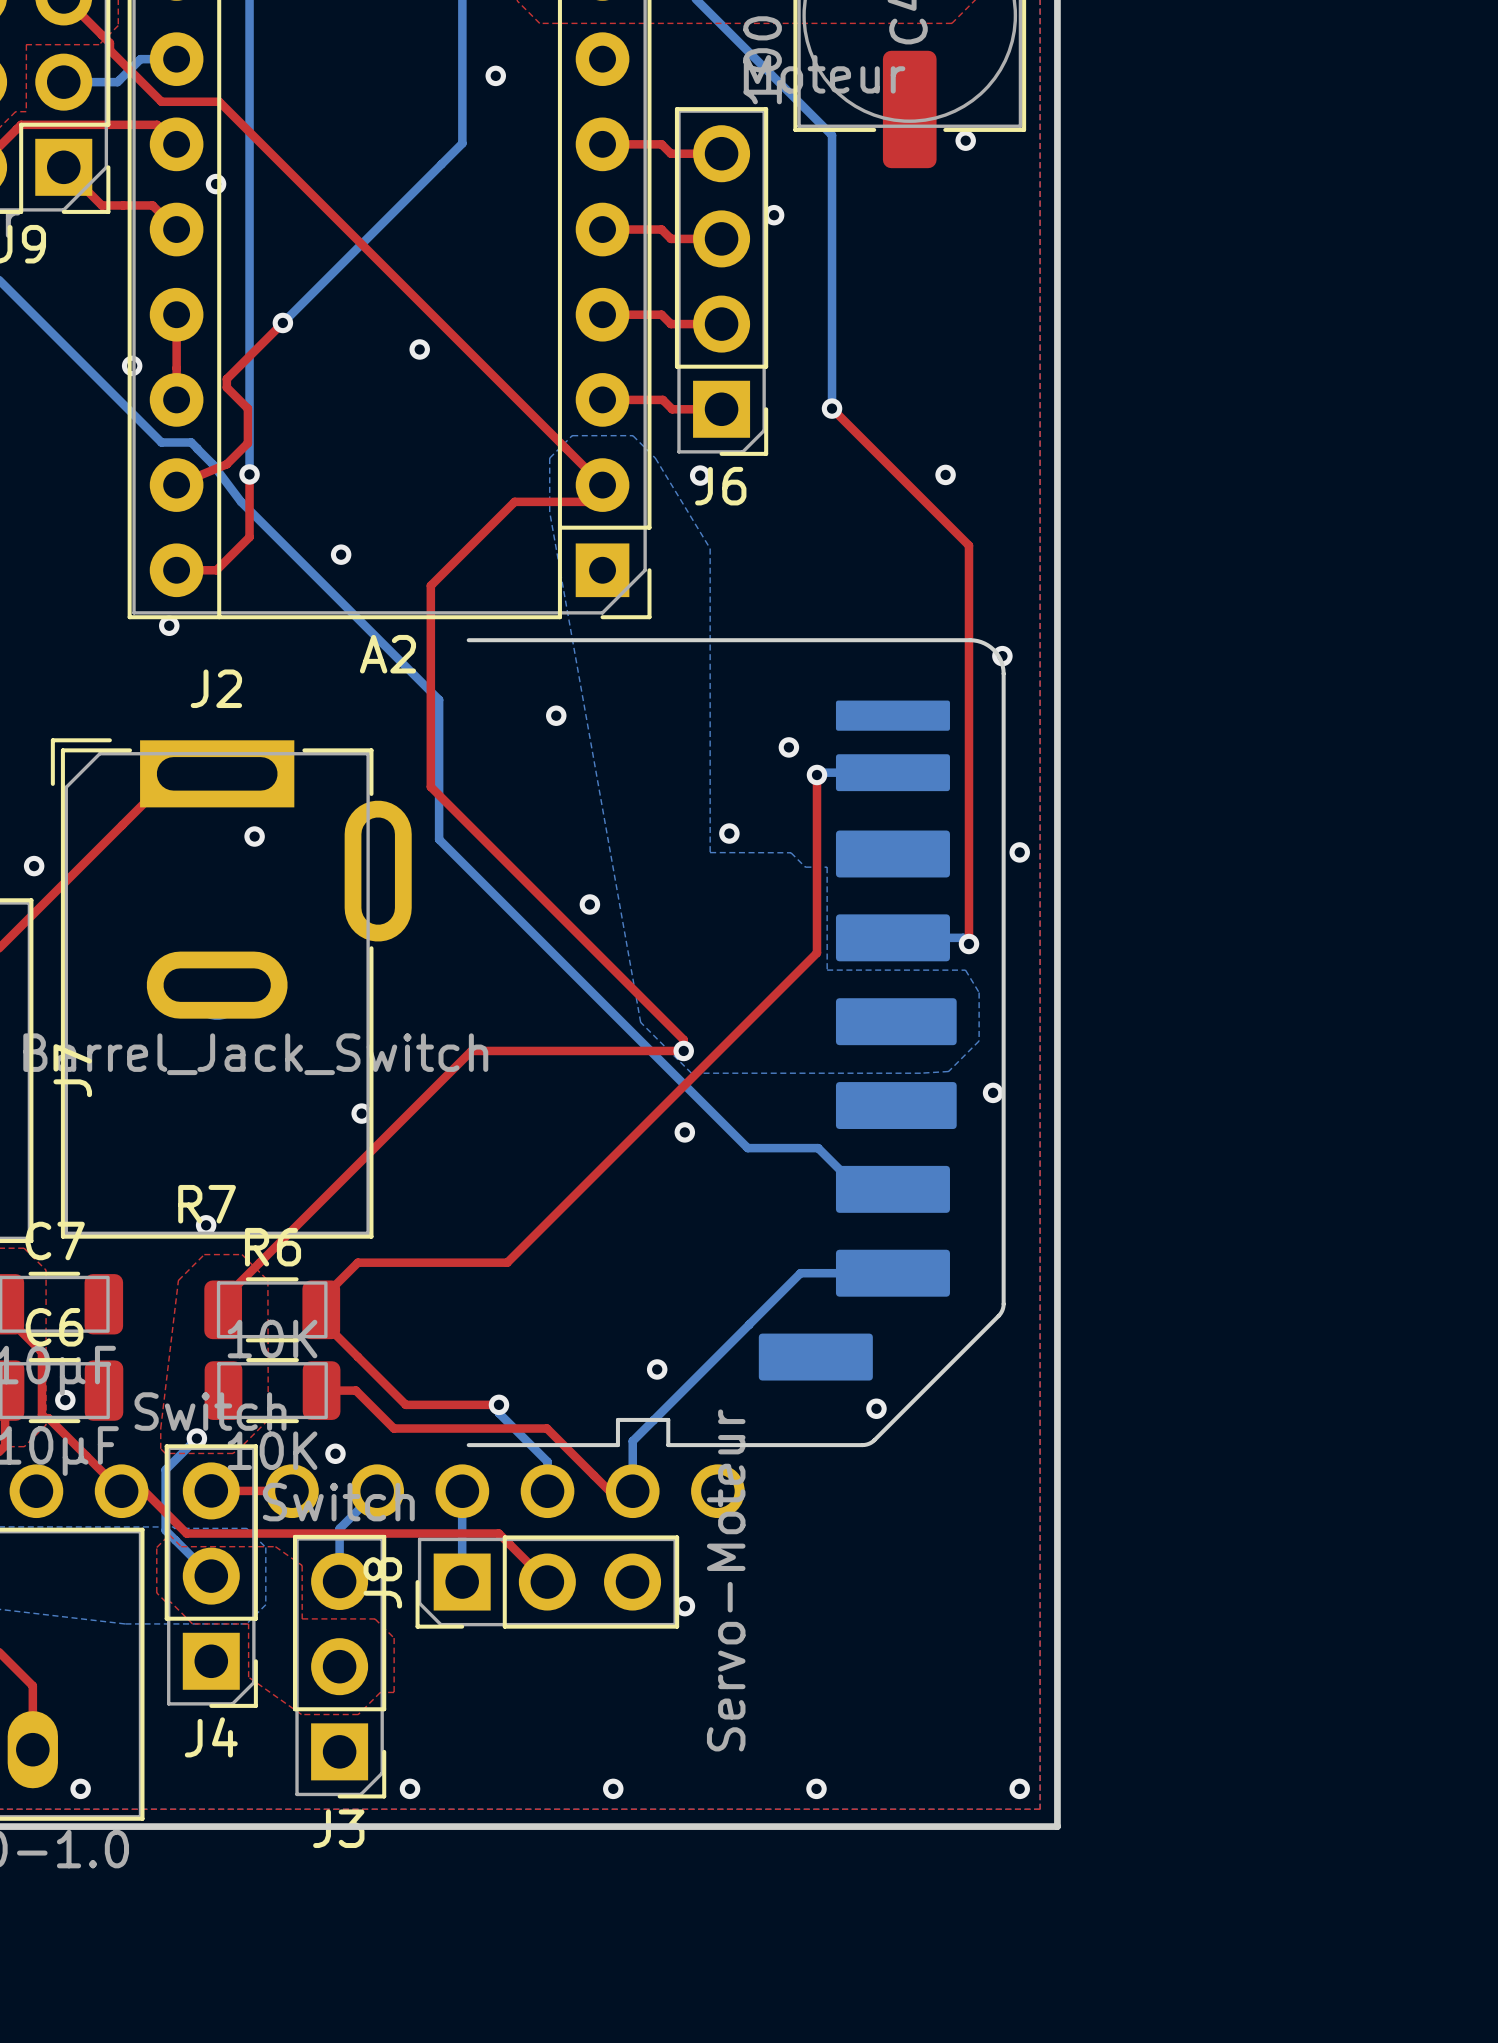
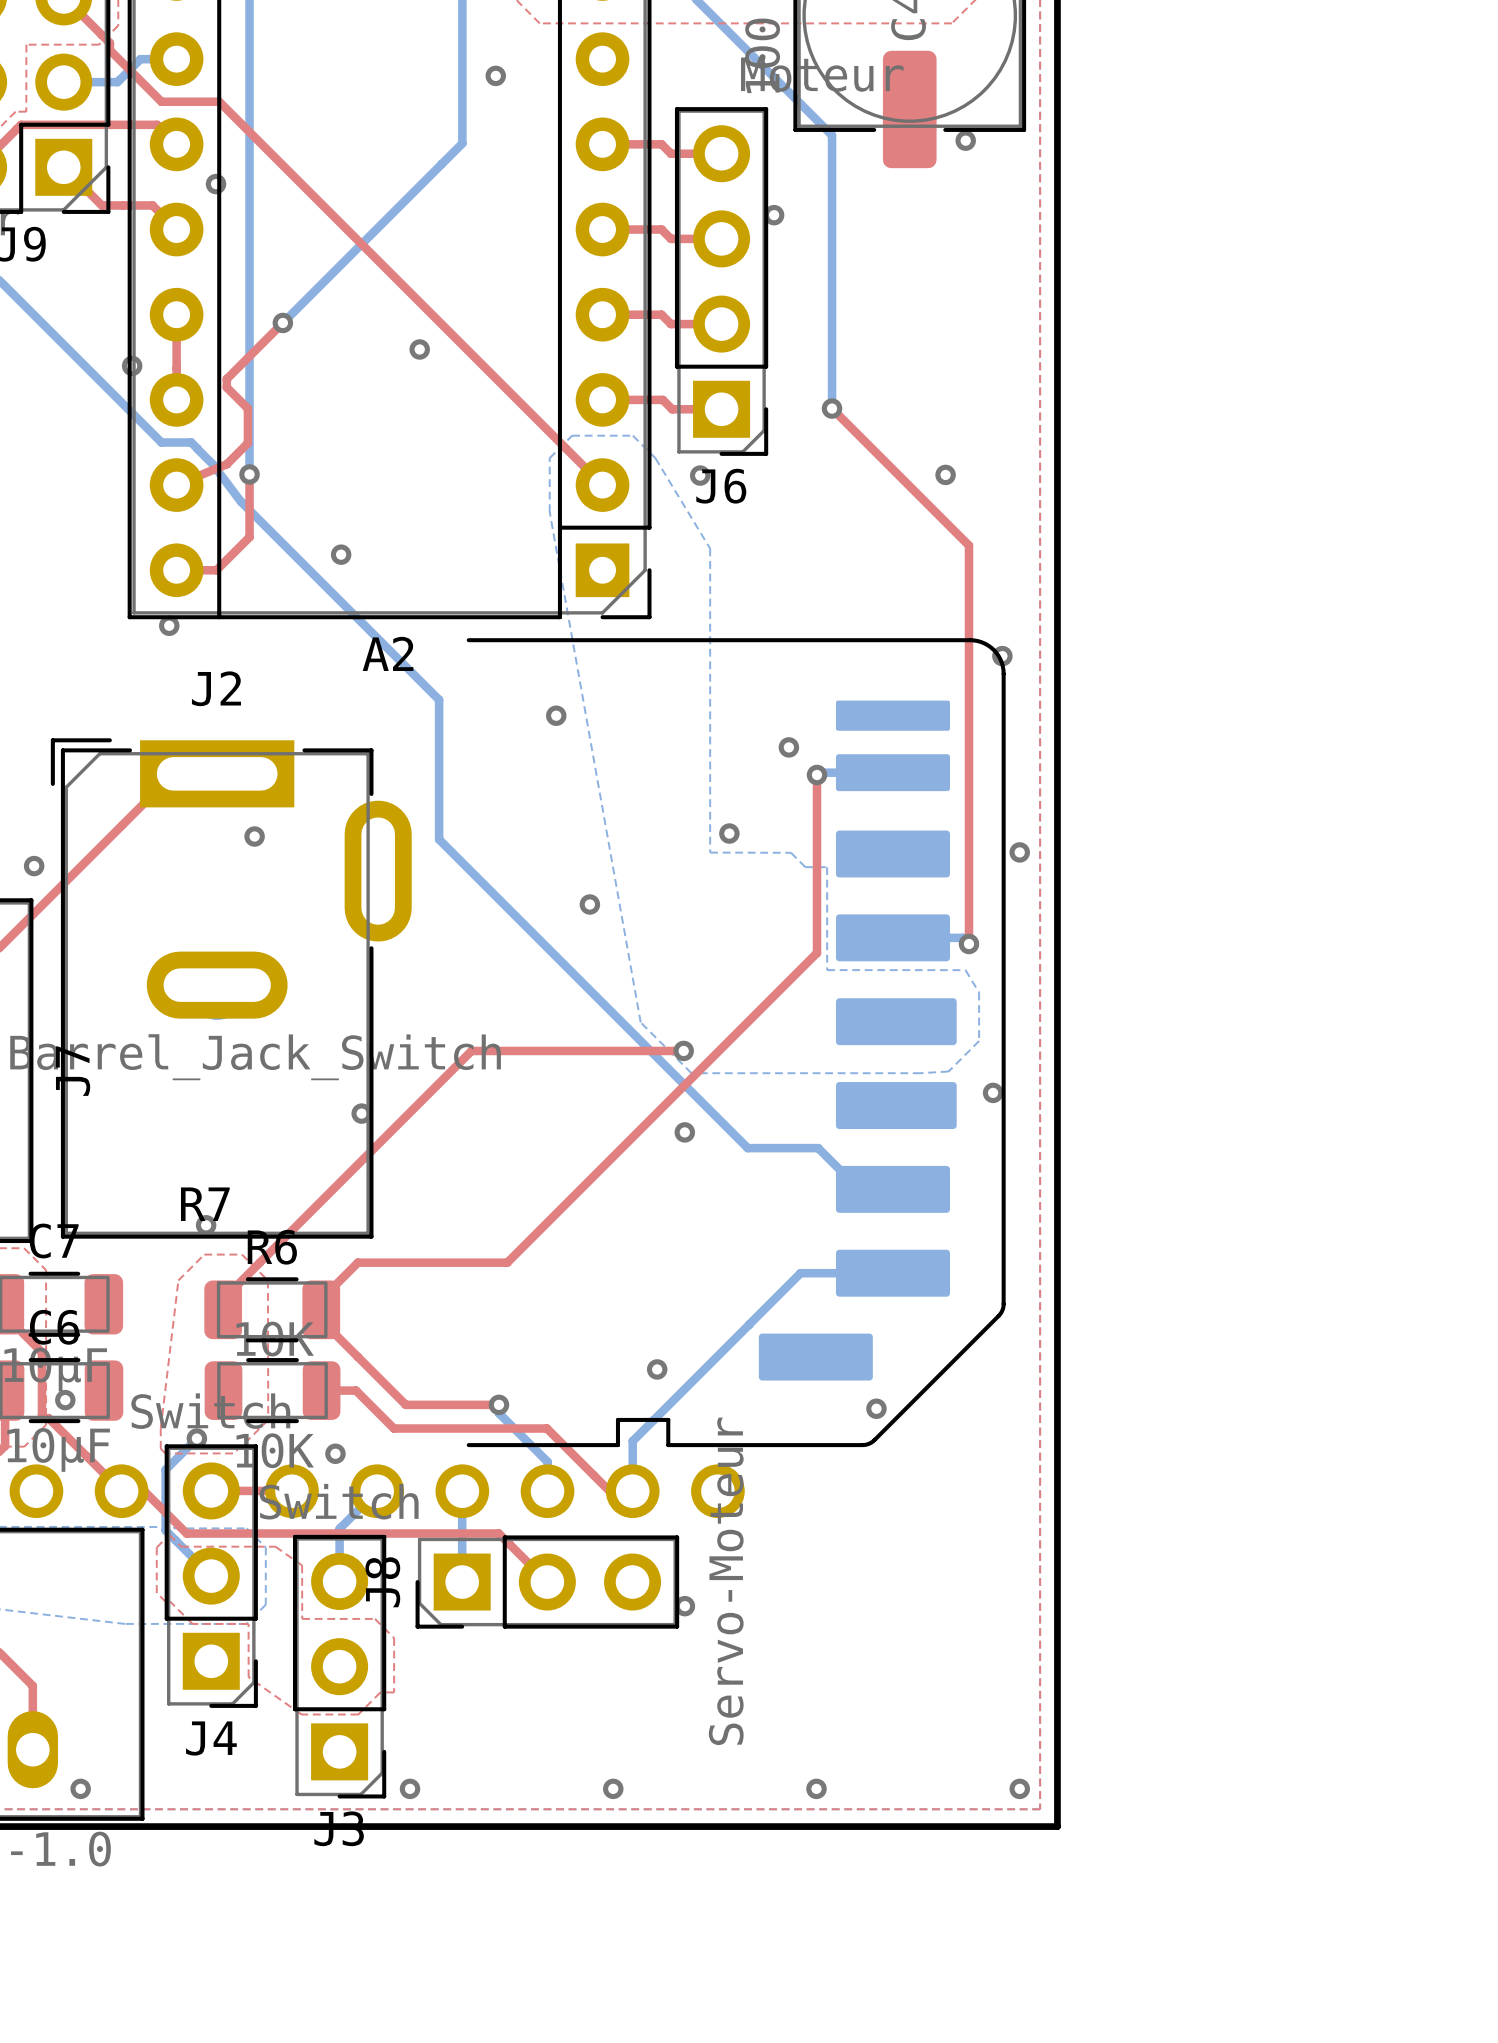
top track: (602, 485) (585, 501) (514, 501) (430, 585) (430, 786) (683, 1039) (683, 1050) -> none

